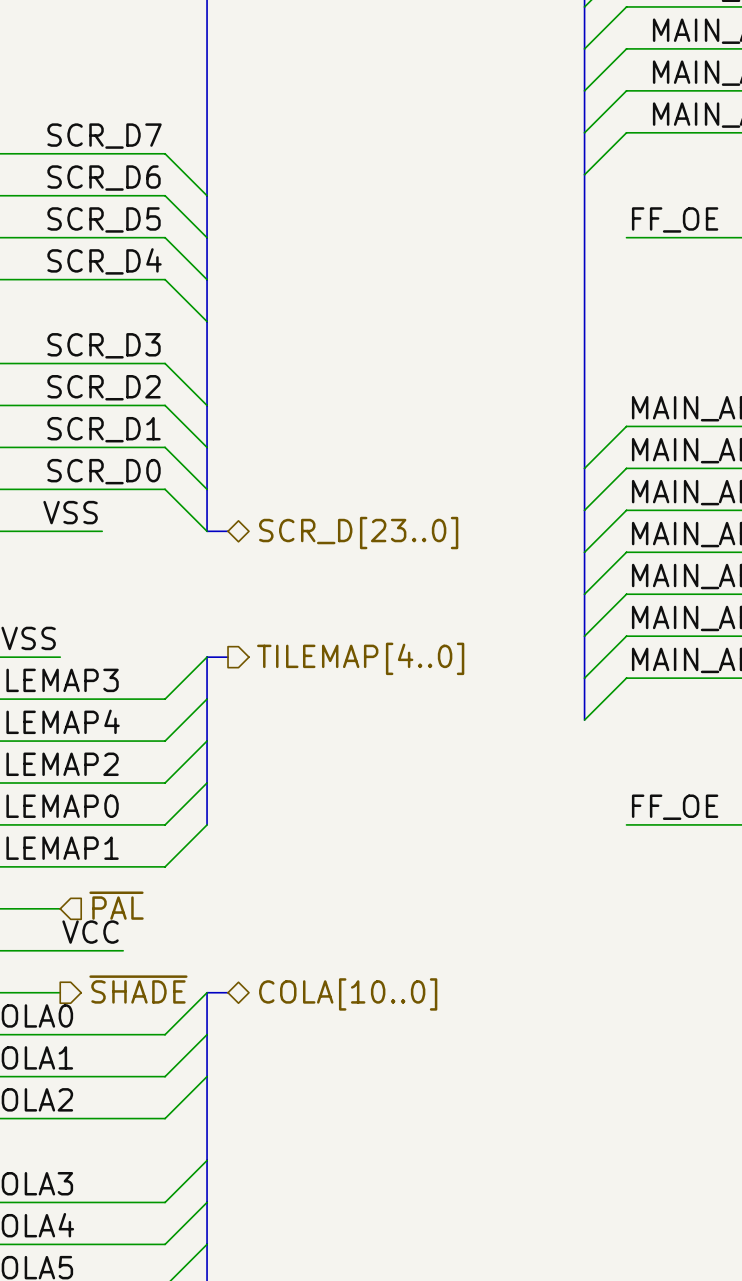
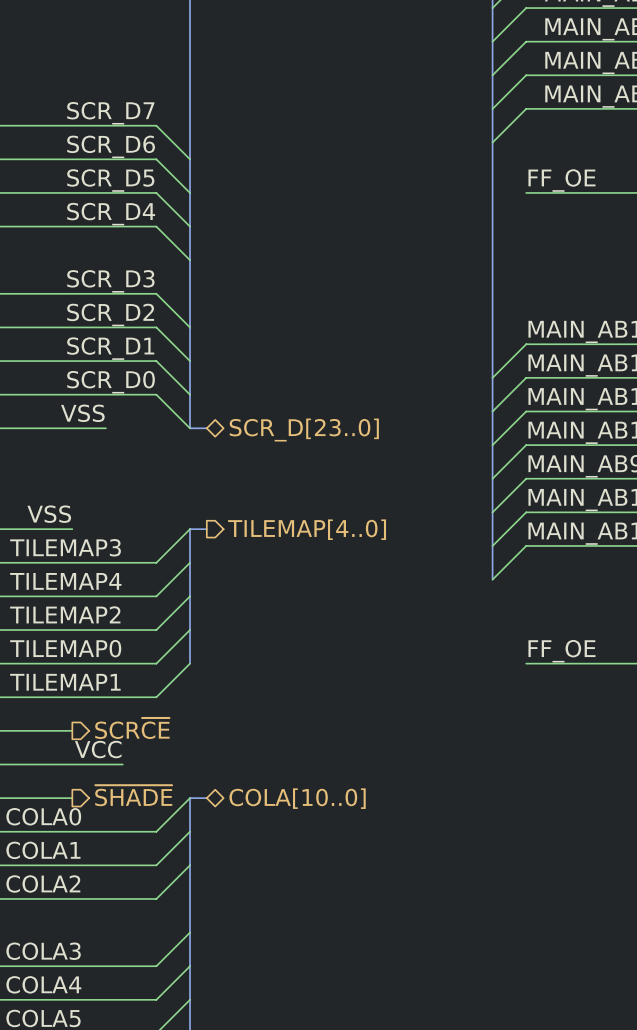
hierarchical label shape: input (116, 905) -> output (132, 728)
hierarchical label: ~{PAL} (116, 905) -> SCR~{CE} (132, 728)

